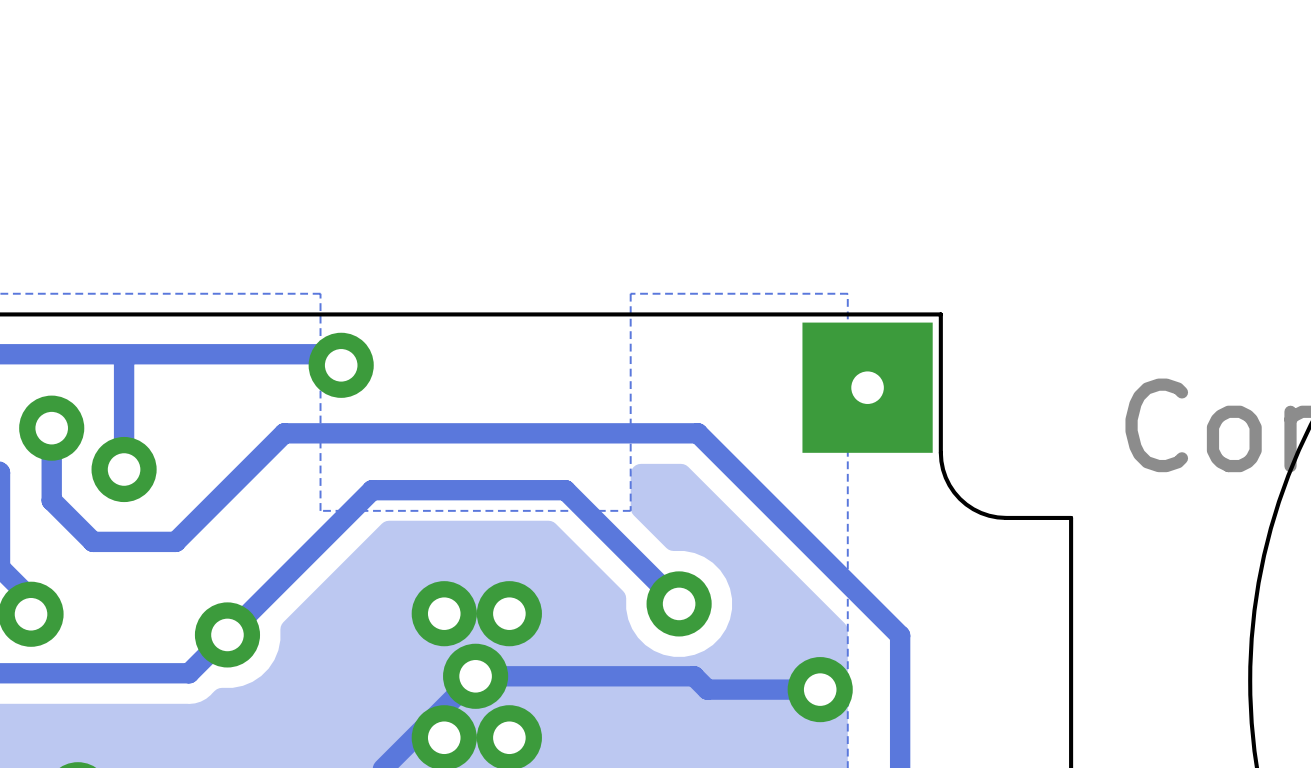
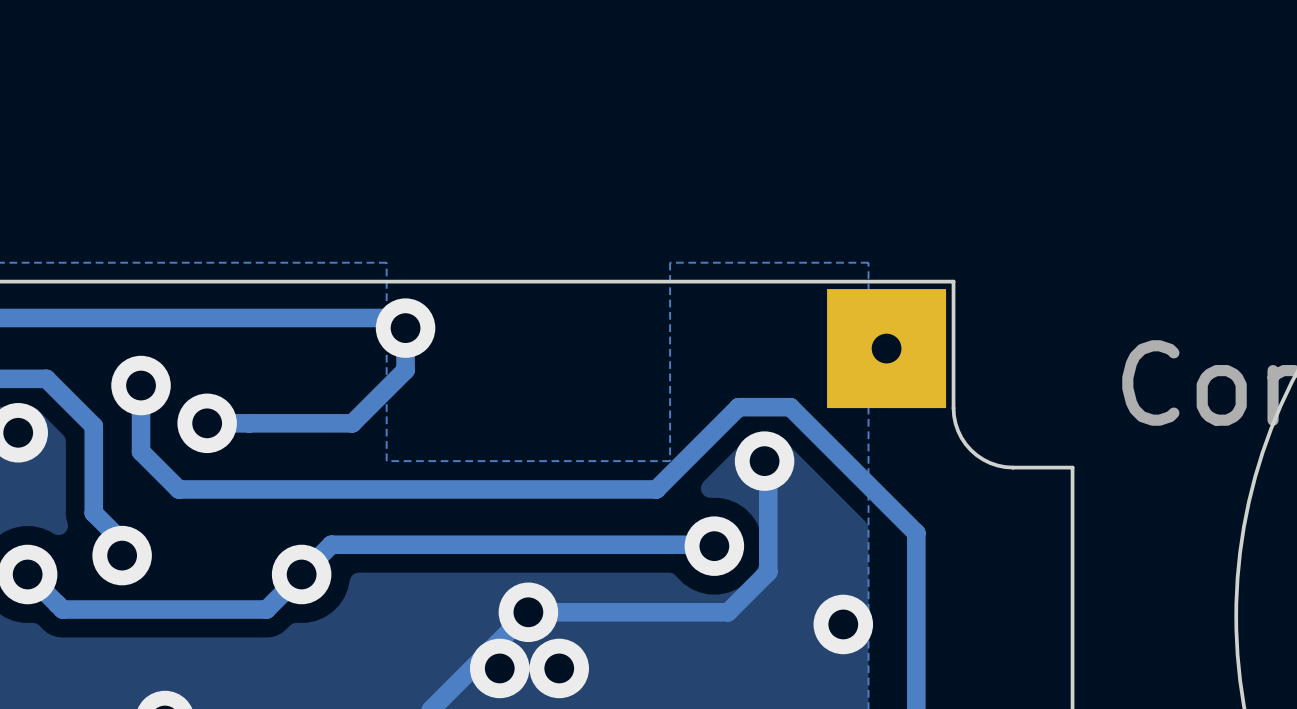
track: (124, 355) (124, 469) -> (405, 328) (405, 370) (352, 423) (207, 423)
via: none -> (764, 461)
track: (175, 541) (284, 433) (697, 433) (900, 635) -> (254, 489) (656, 489) (738, 407) (790, 407) (916, 533) (916, 575)
track: (677, 602) (565, 490) (372, 490) (260, 602) -> (712, 544) (331, 544)
via: (444, 613) -> none
via: (509, 613) -> none
track: (694, 676) (707, 689) (820, 689) -> (728, 612) (768, 572) (768, 464) (764, 461)

